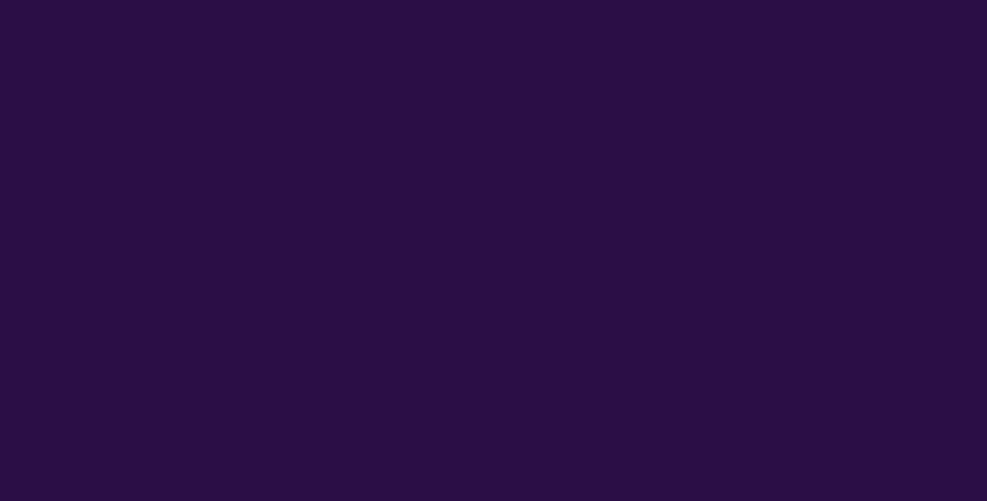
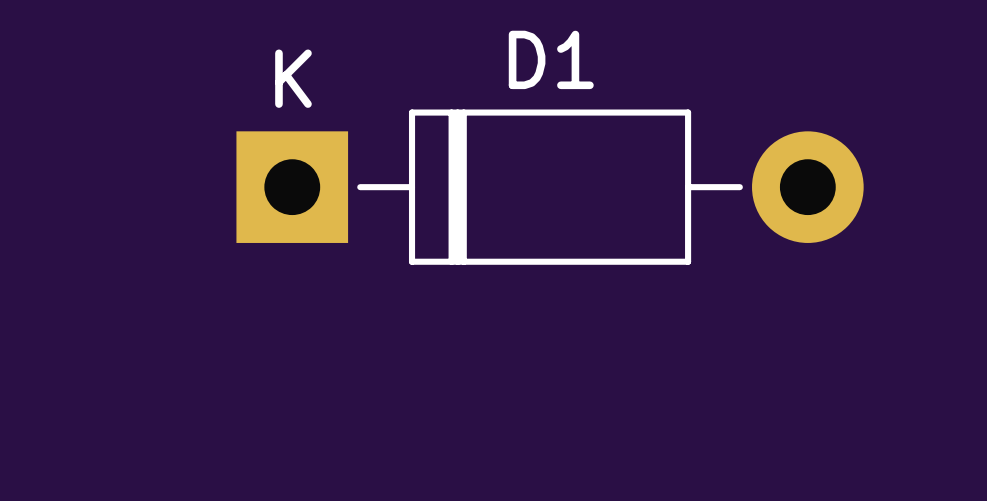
D1: none -> (550, 187)

